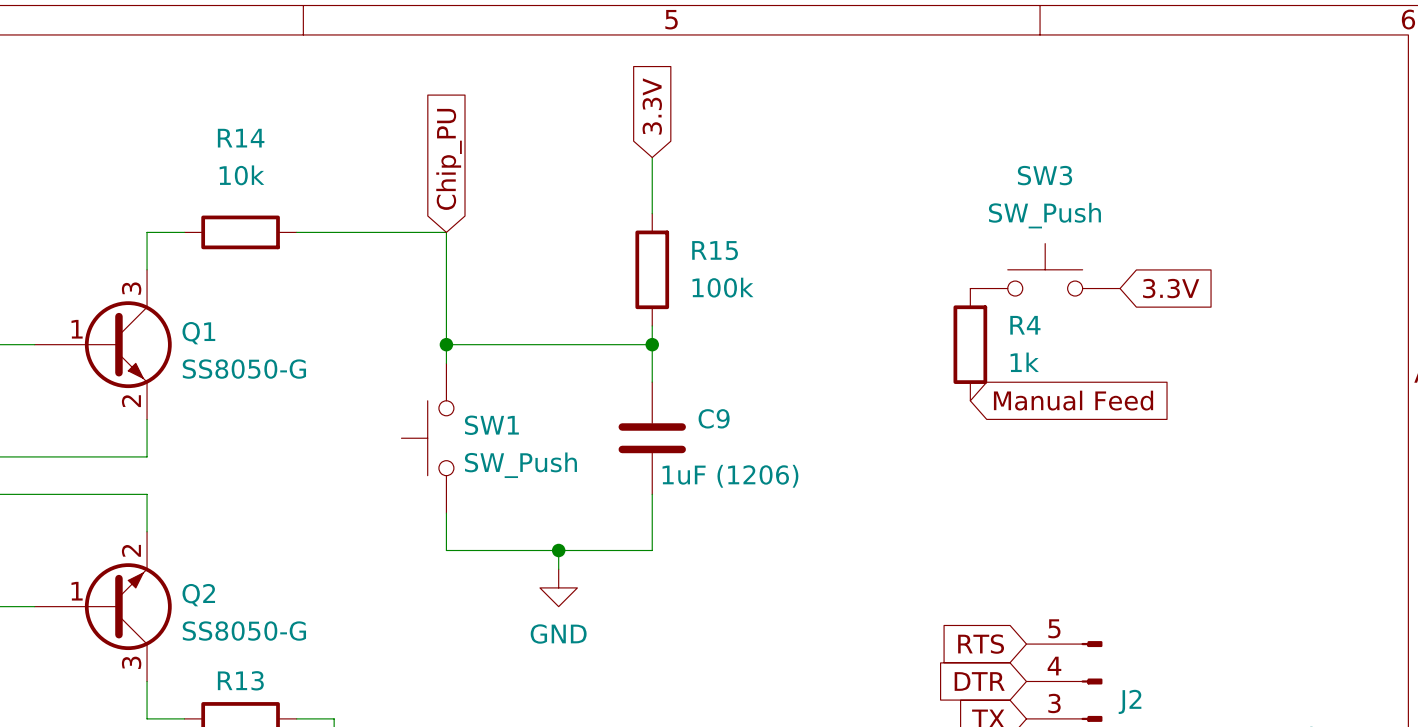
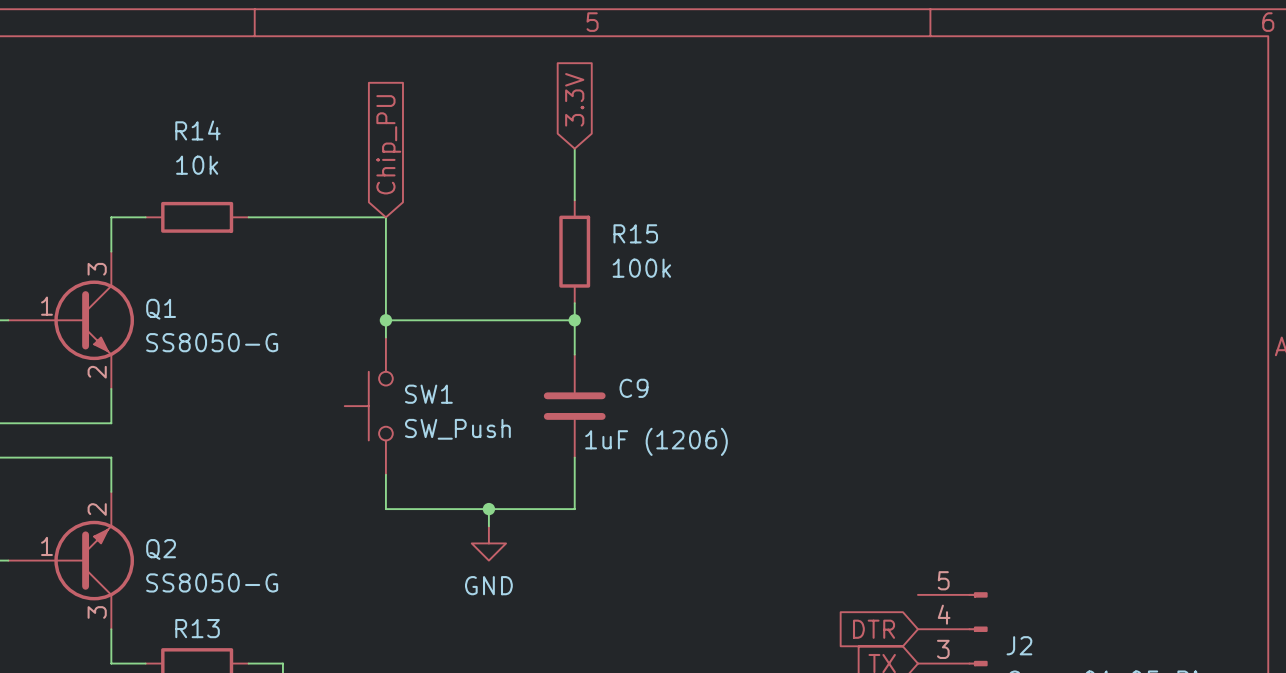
SW3: SW_Push (1045, 269) -> none
global label: 3.3V (1171, 288) -> none
R4: 1k (970, 344) -> none
global label: Manual Feed (1073, 400) -> none
global label: RTS (981, 644) -> none

